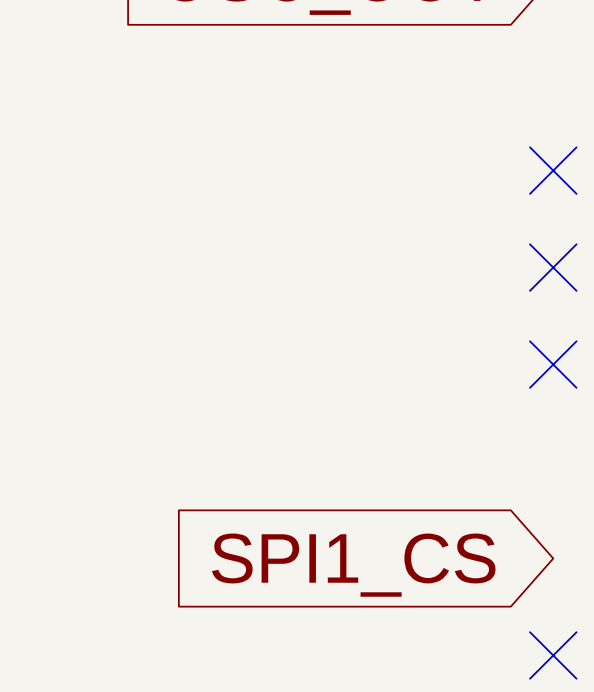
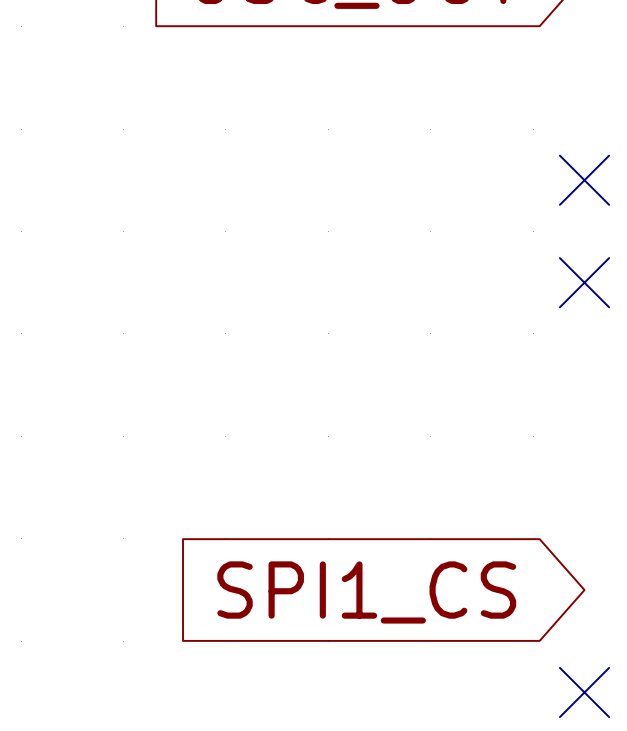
no-connect mark: (553, 364) -> none

